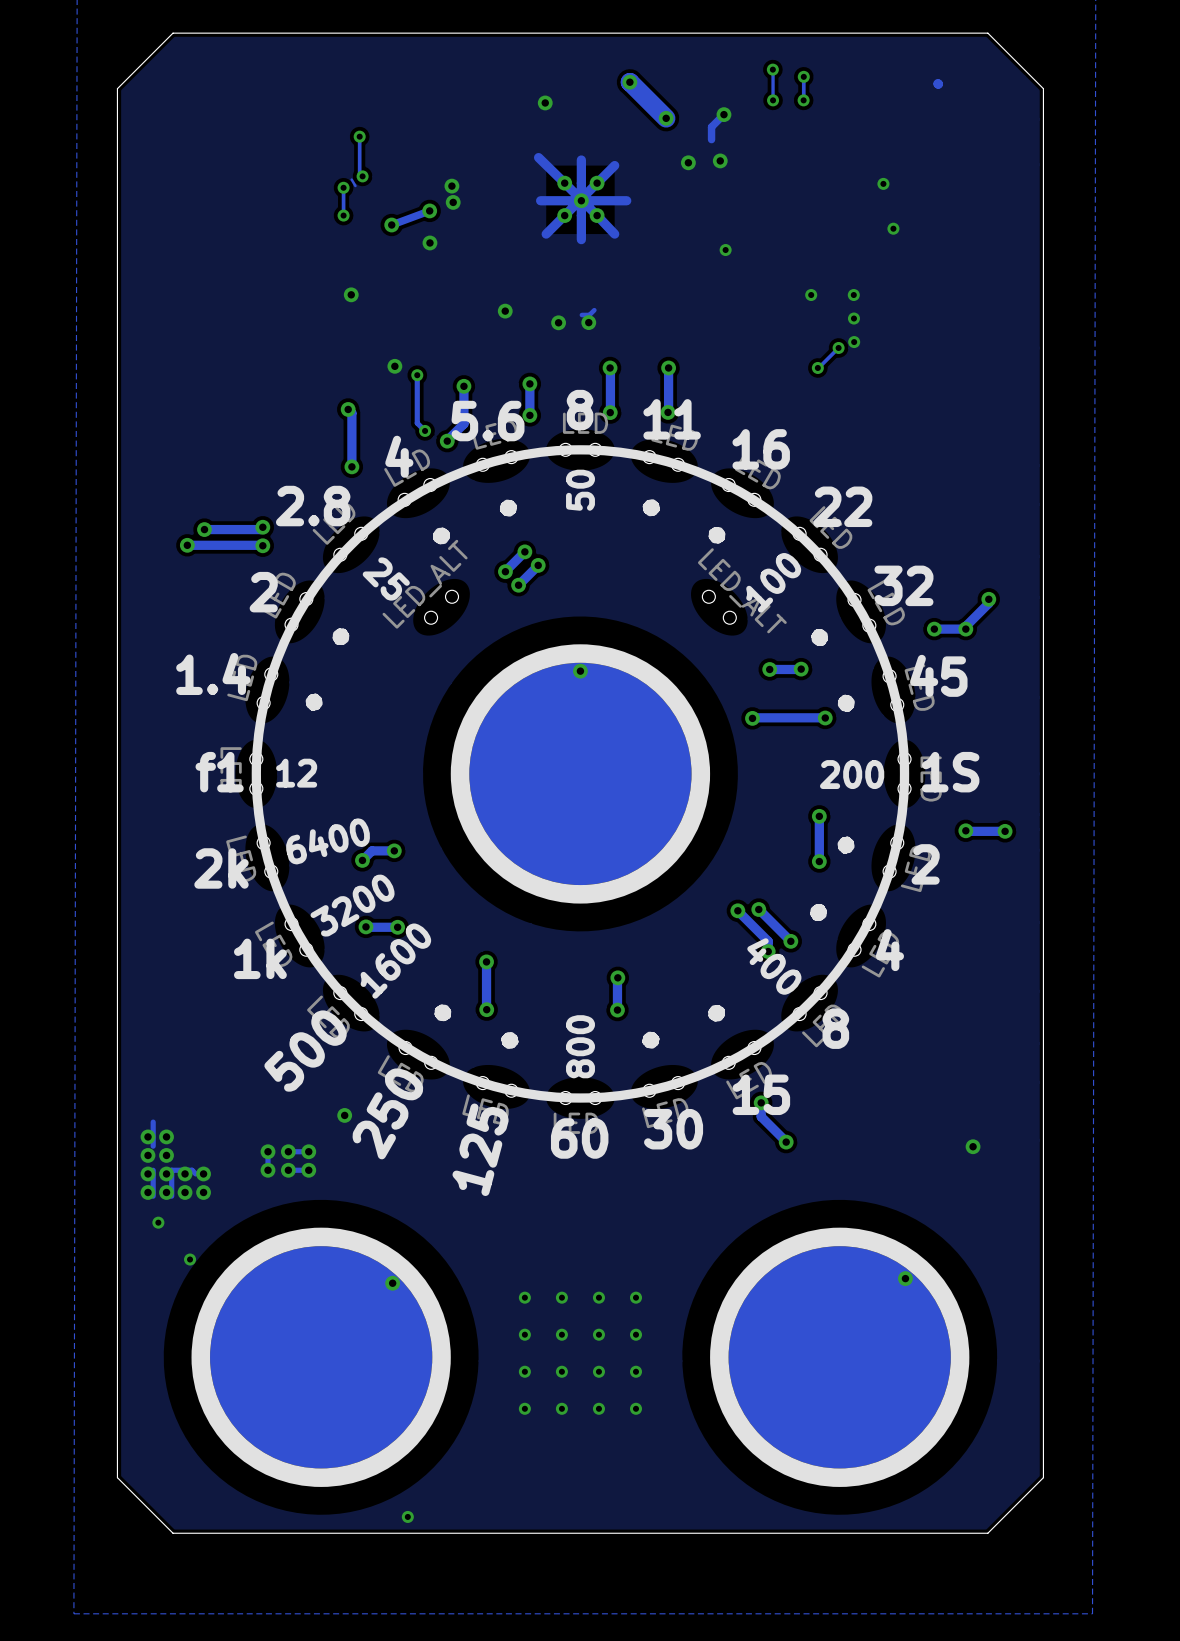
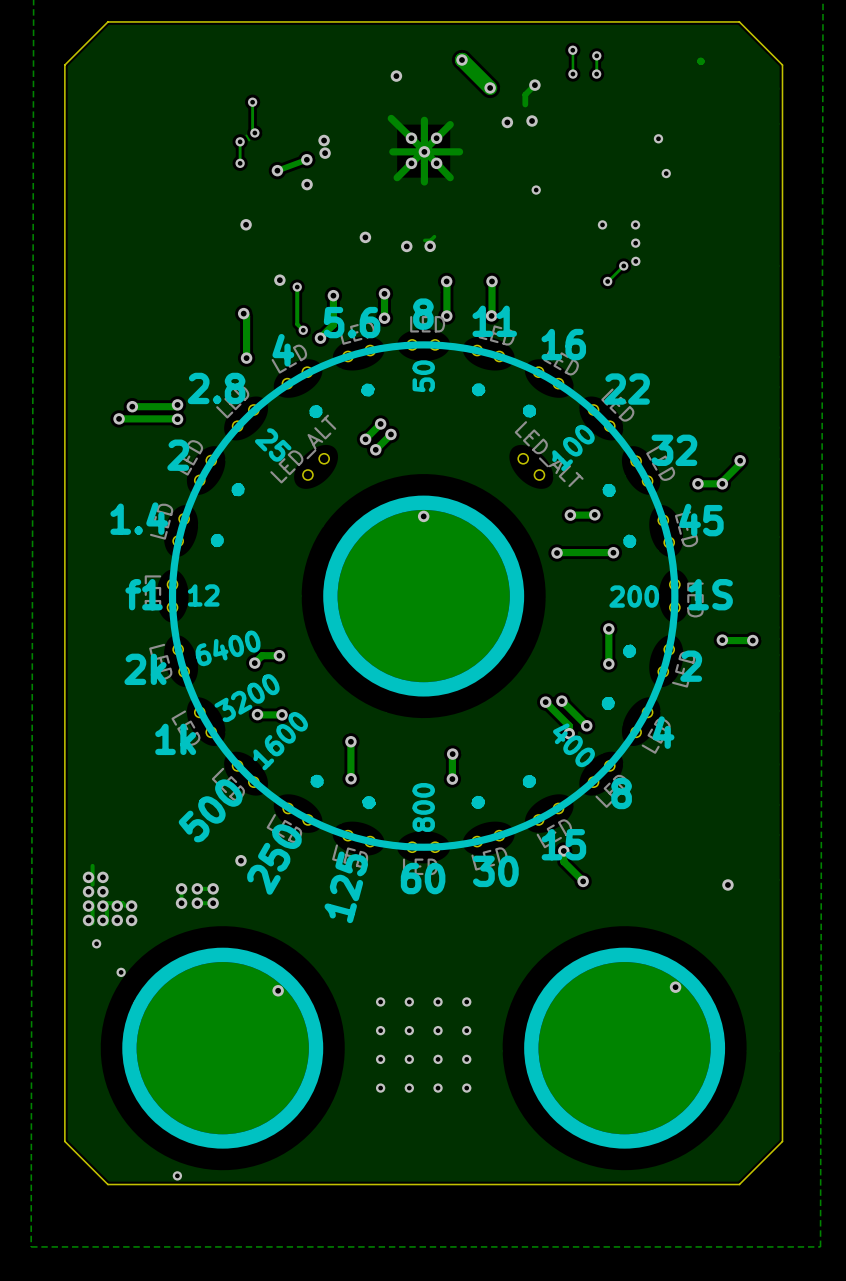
via: (407, 1516) -> none
via: none -> (177, 1175)

